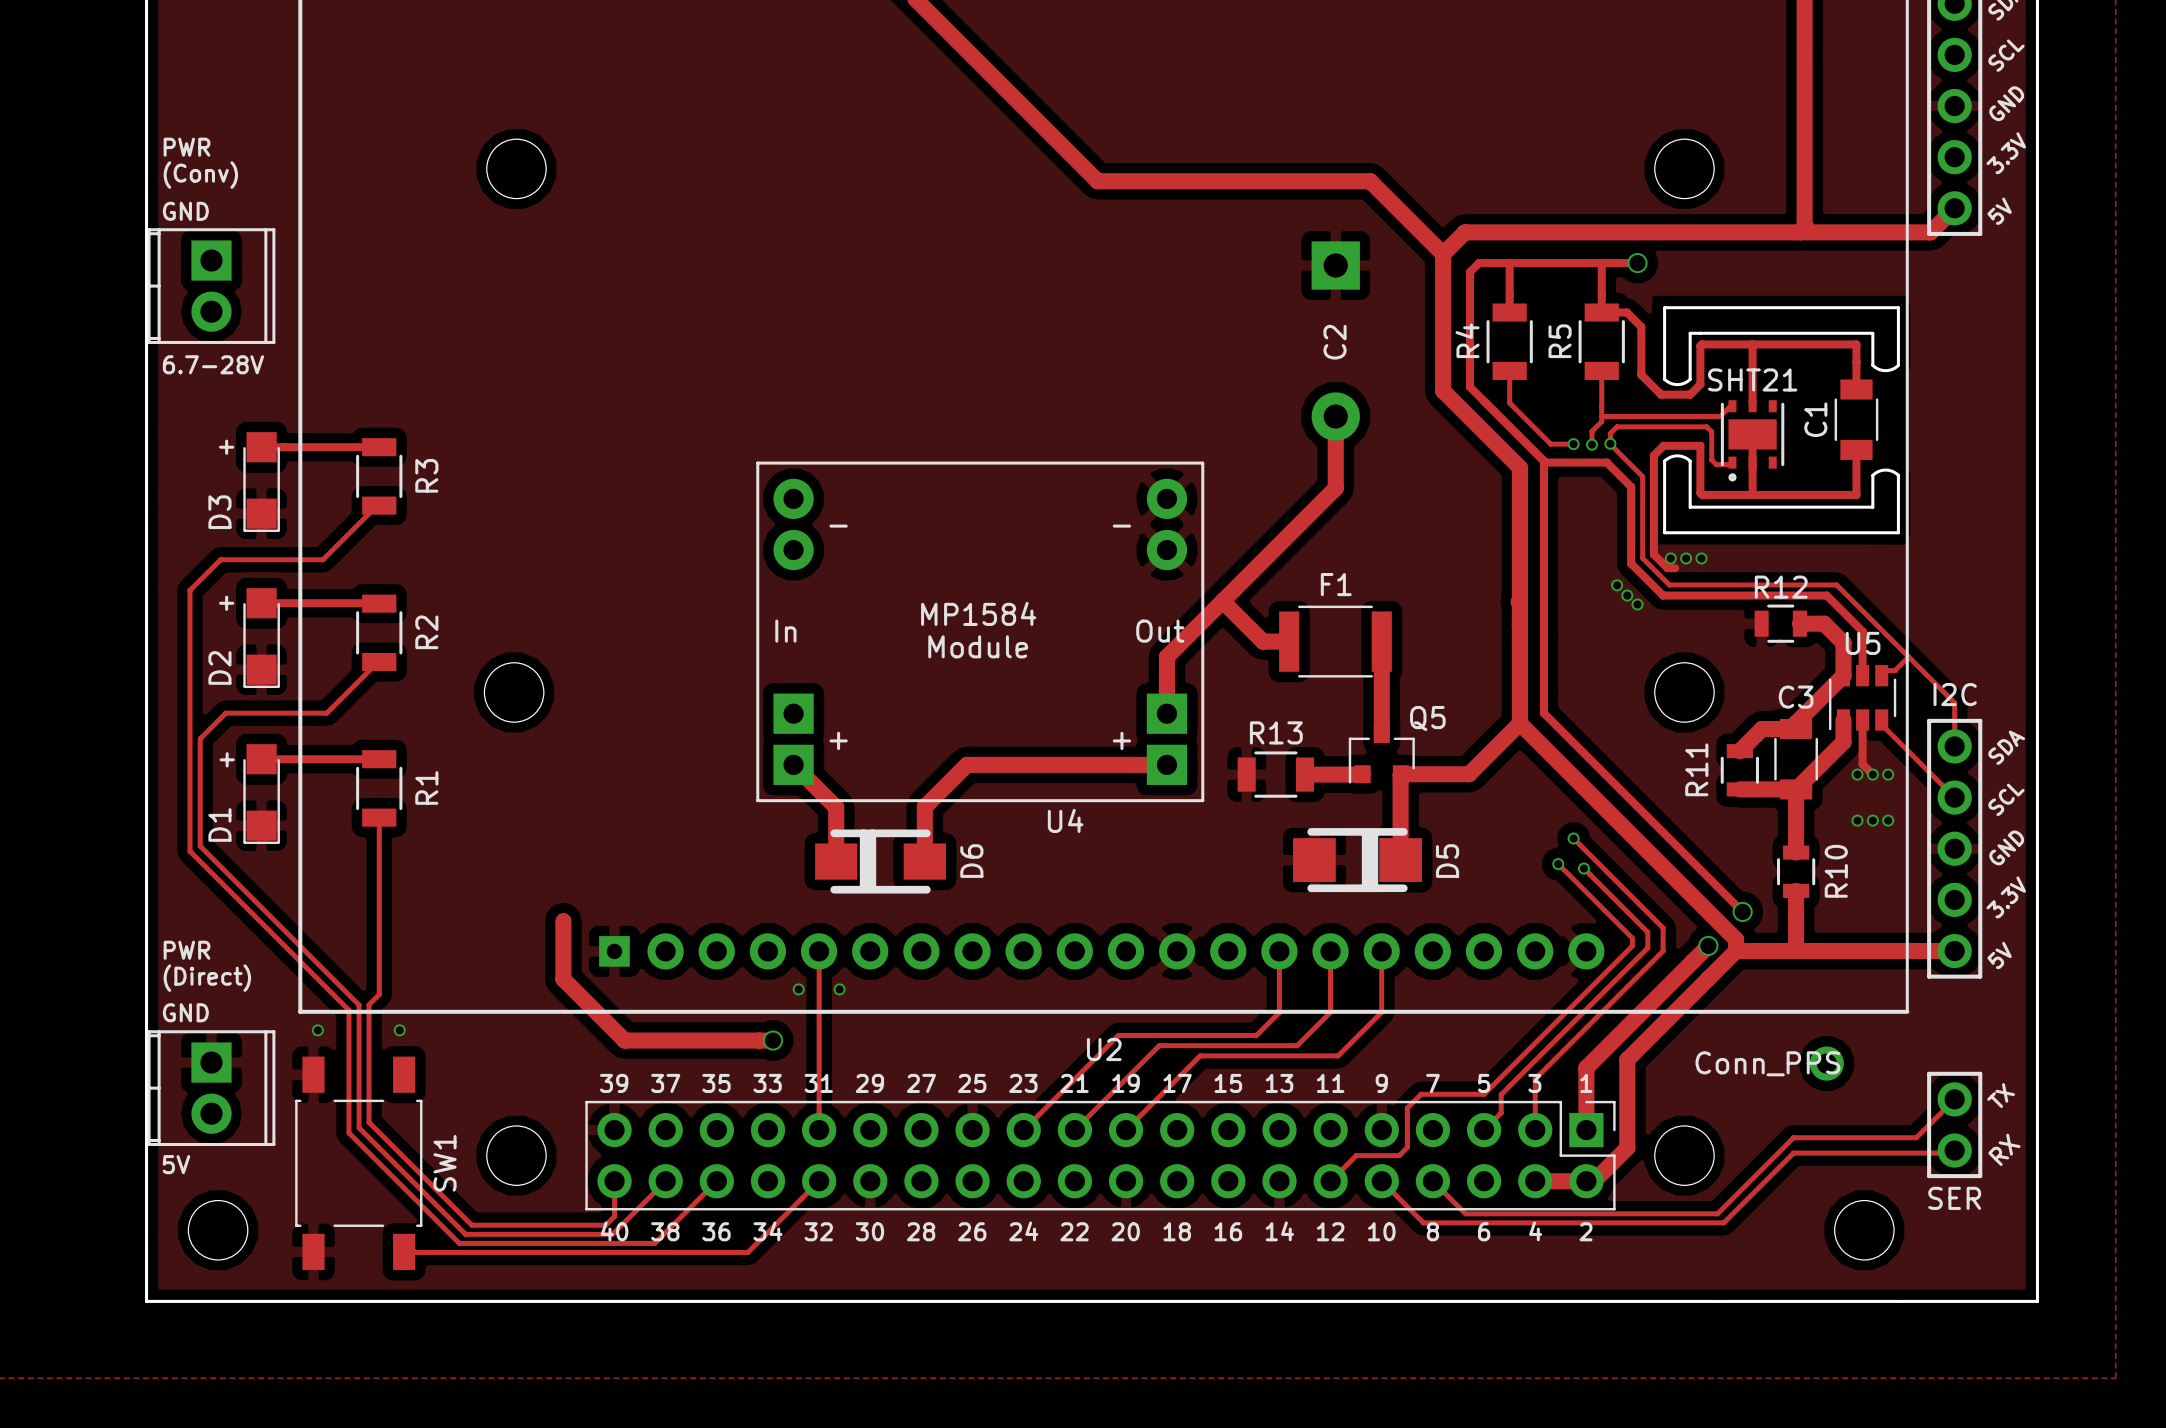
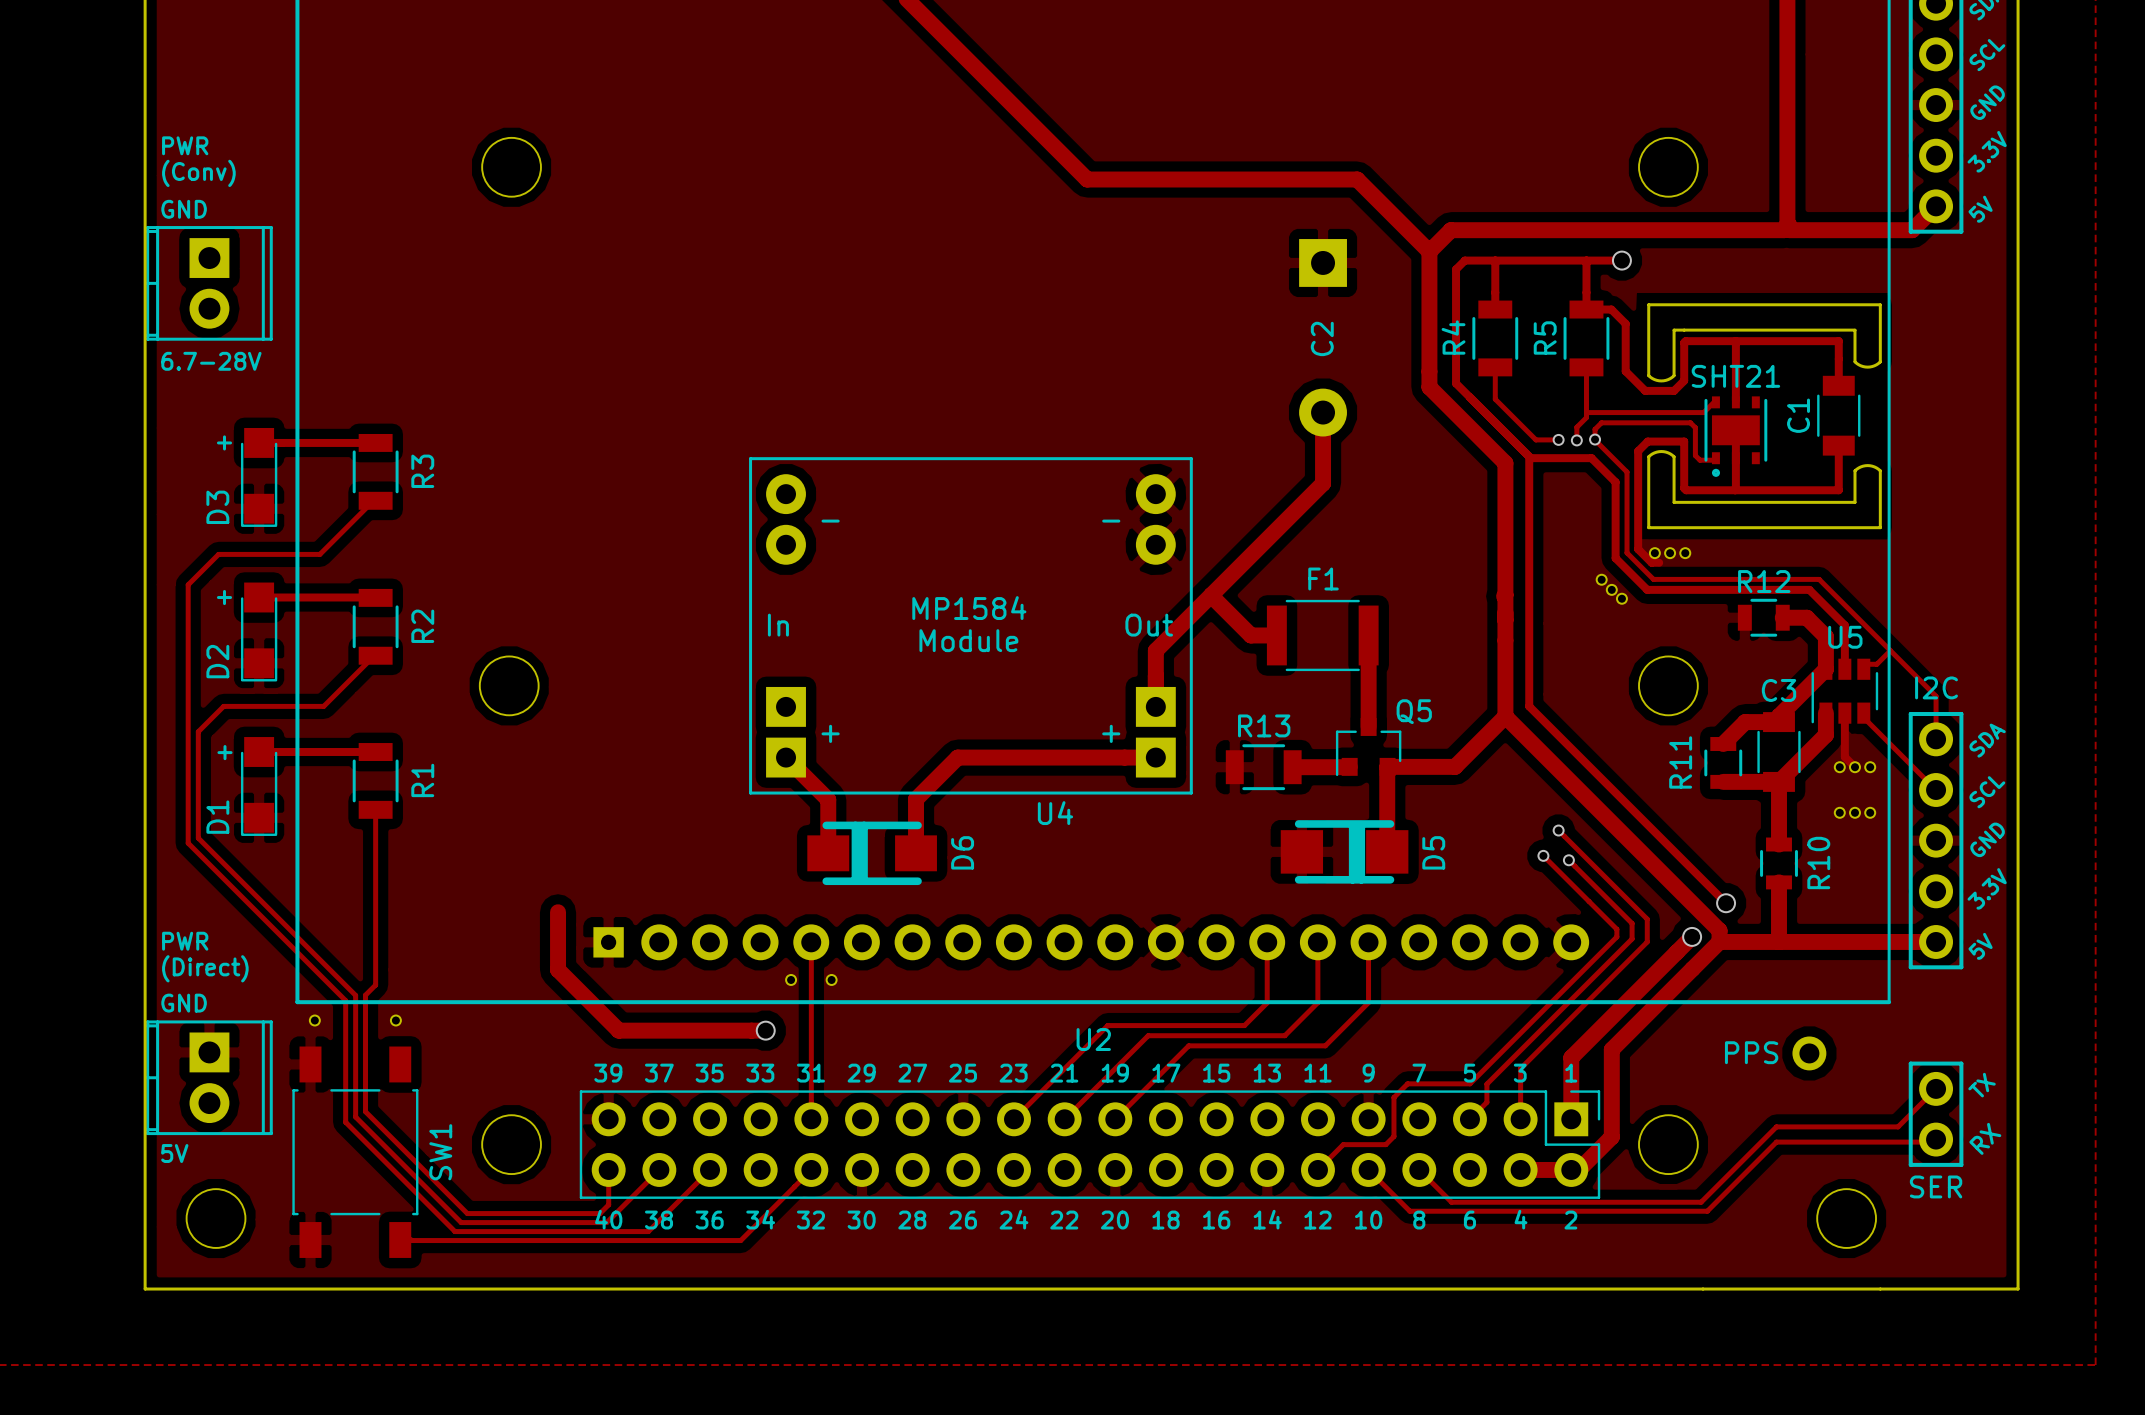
part value: Conn_PPS (1767, 1063) -> PPS (1751, 1052)

